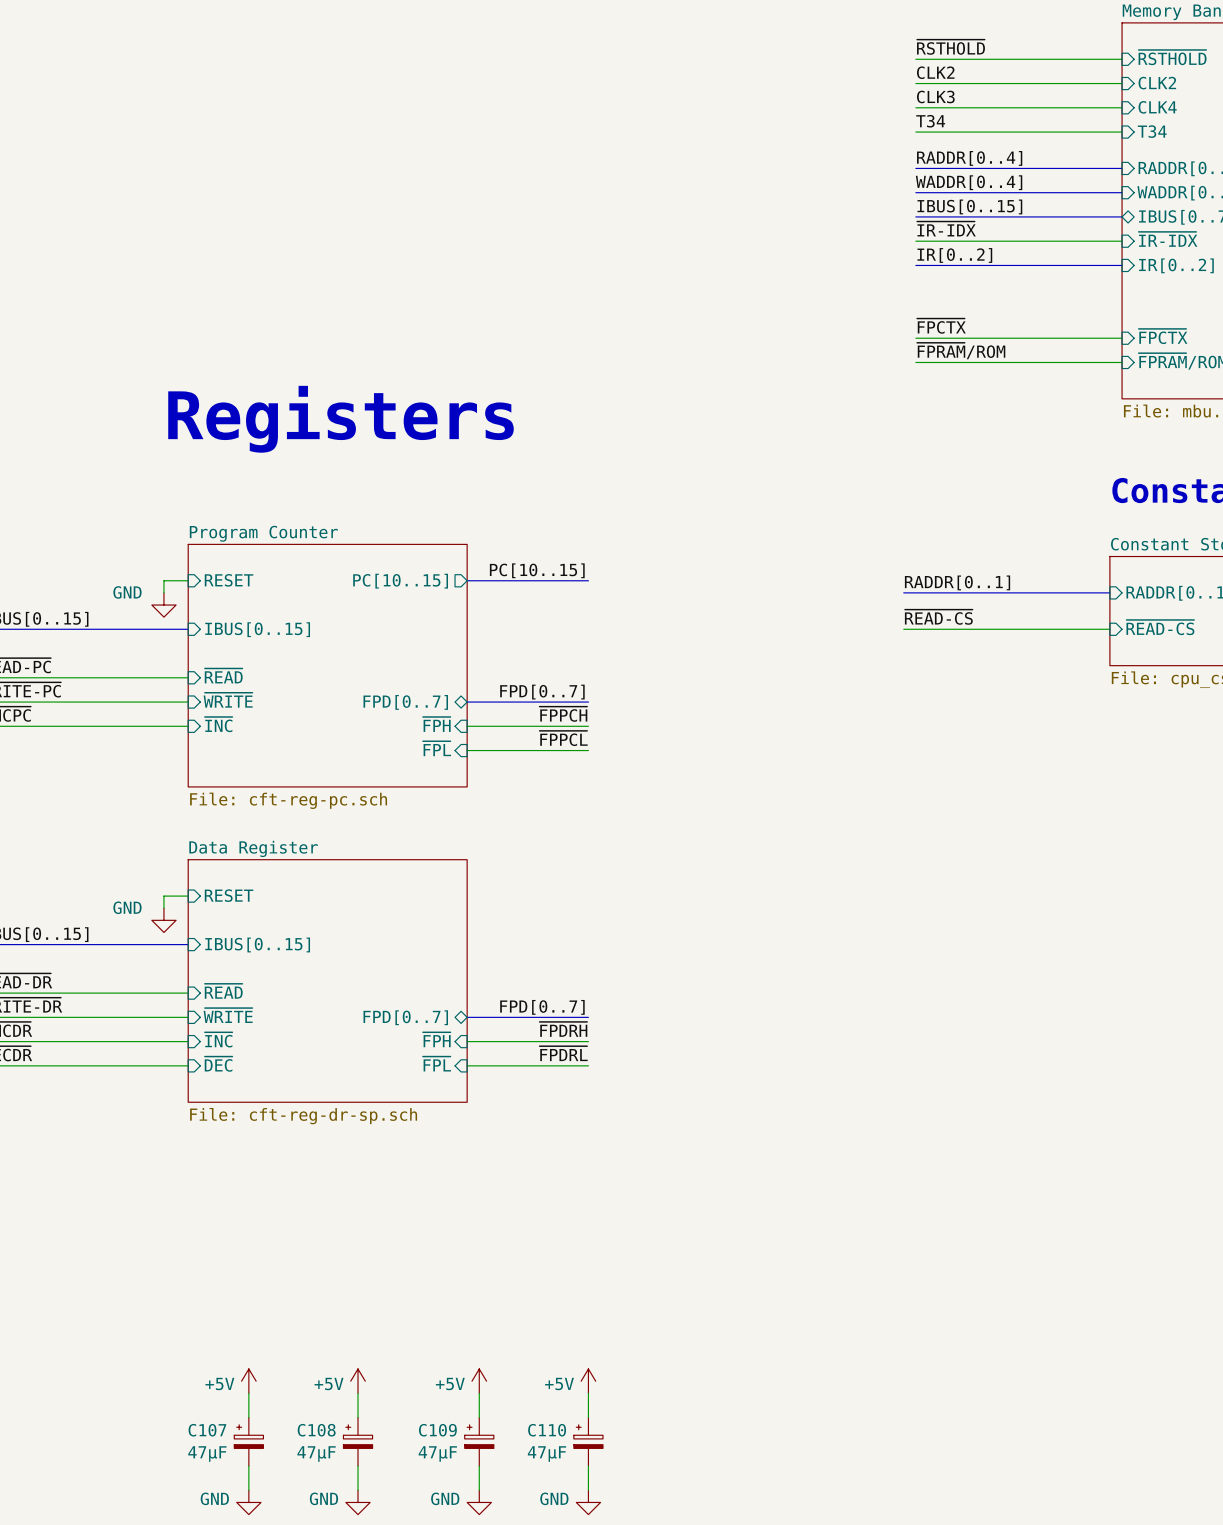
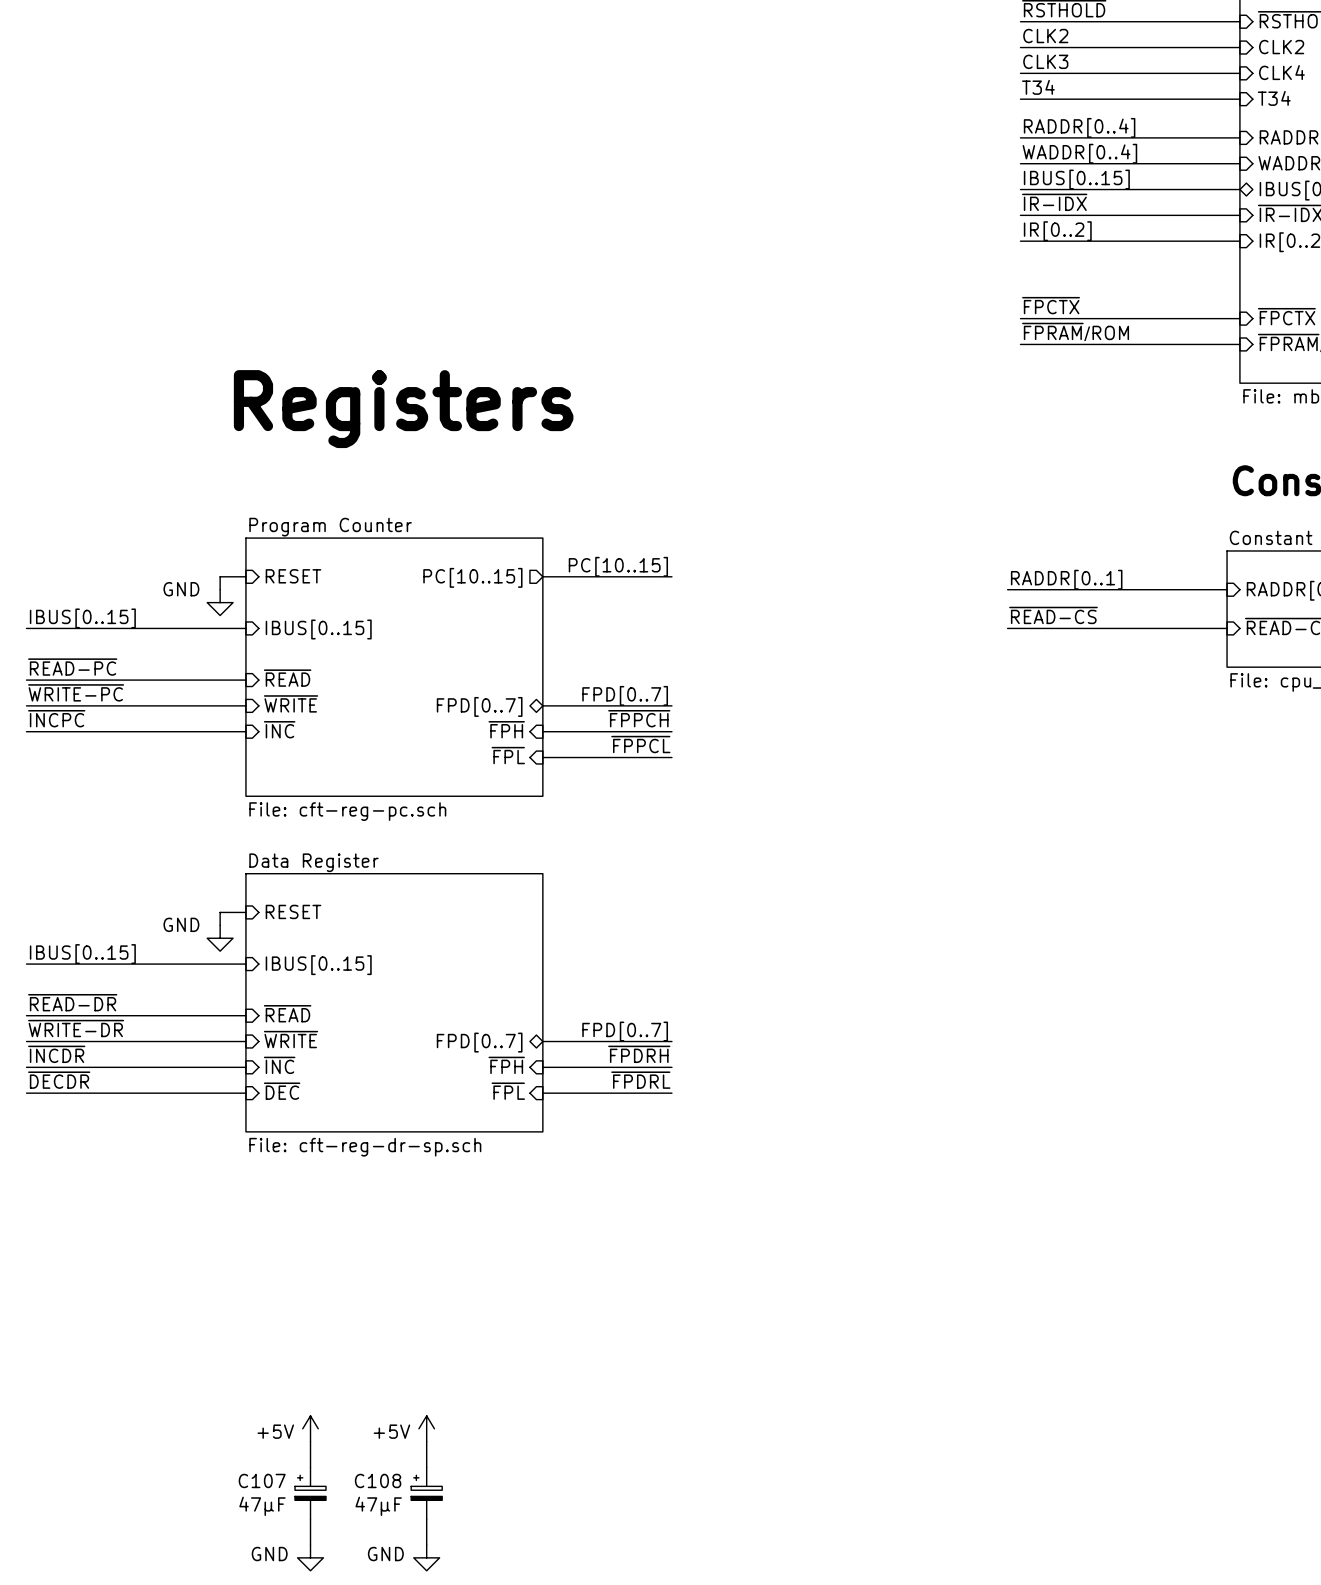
power symbol: +5V (479, 1381) -> none
power symbol: +5V (588, 1381) -> none
wire: (479, 1393) (479, 1417) -> none
wire: (588, 1393) (588, 1417) -> none
C109: 47µF (479, 1441) -> none
C110: 47µF (588, 1441) -> none
wire: (479, 1466) (479, 1490) -> none
wire: (588, 1466) (588, 1490) -> none
power symbol: GND (479, 1502) -> none
power symbol: GND (588, 1502) -> none

